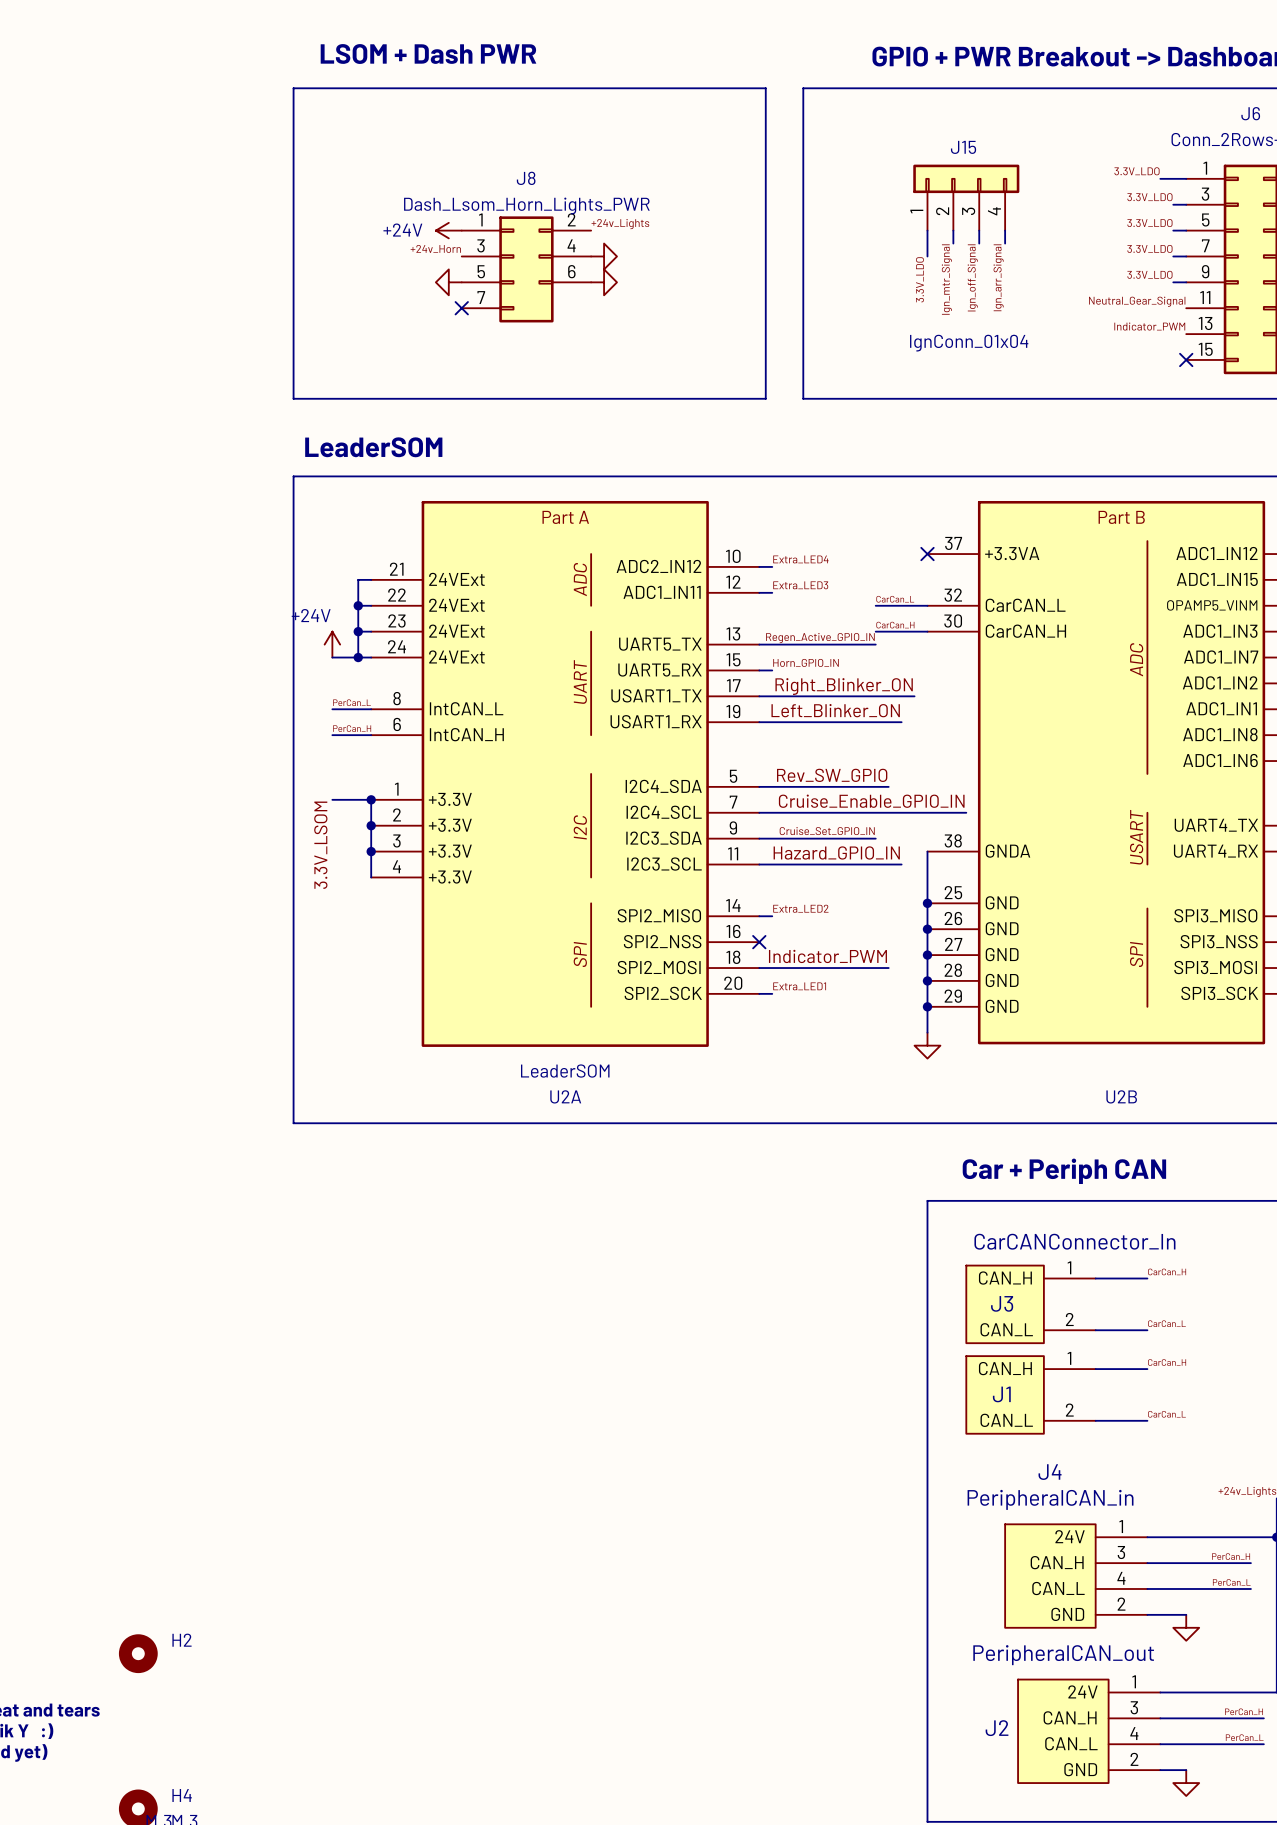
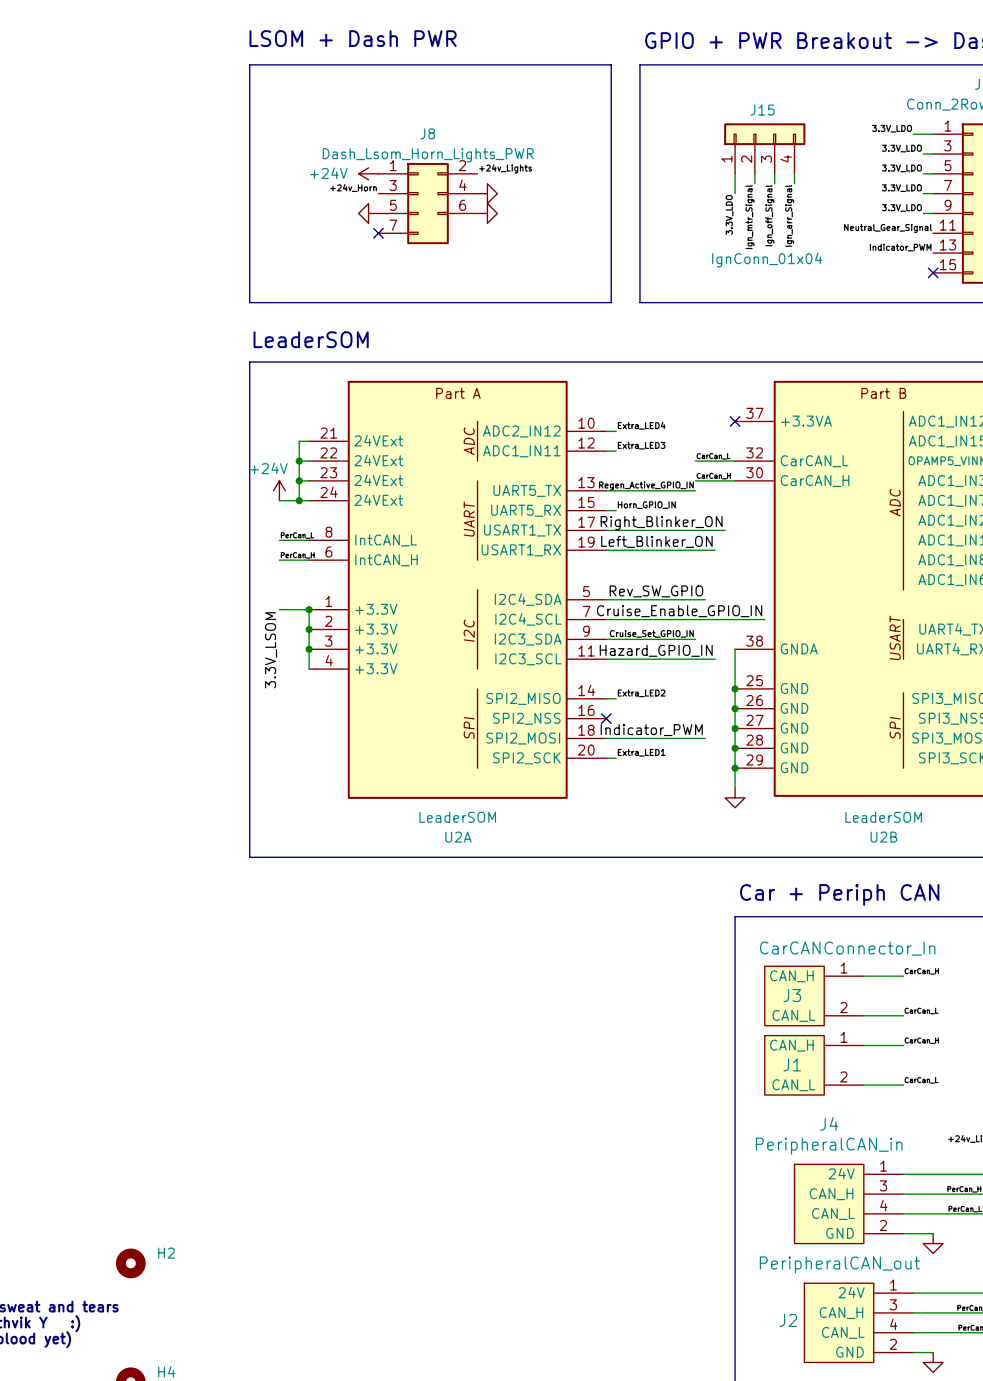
U2B value: none -> LeaderSOM (883, 817)

